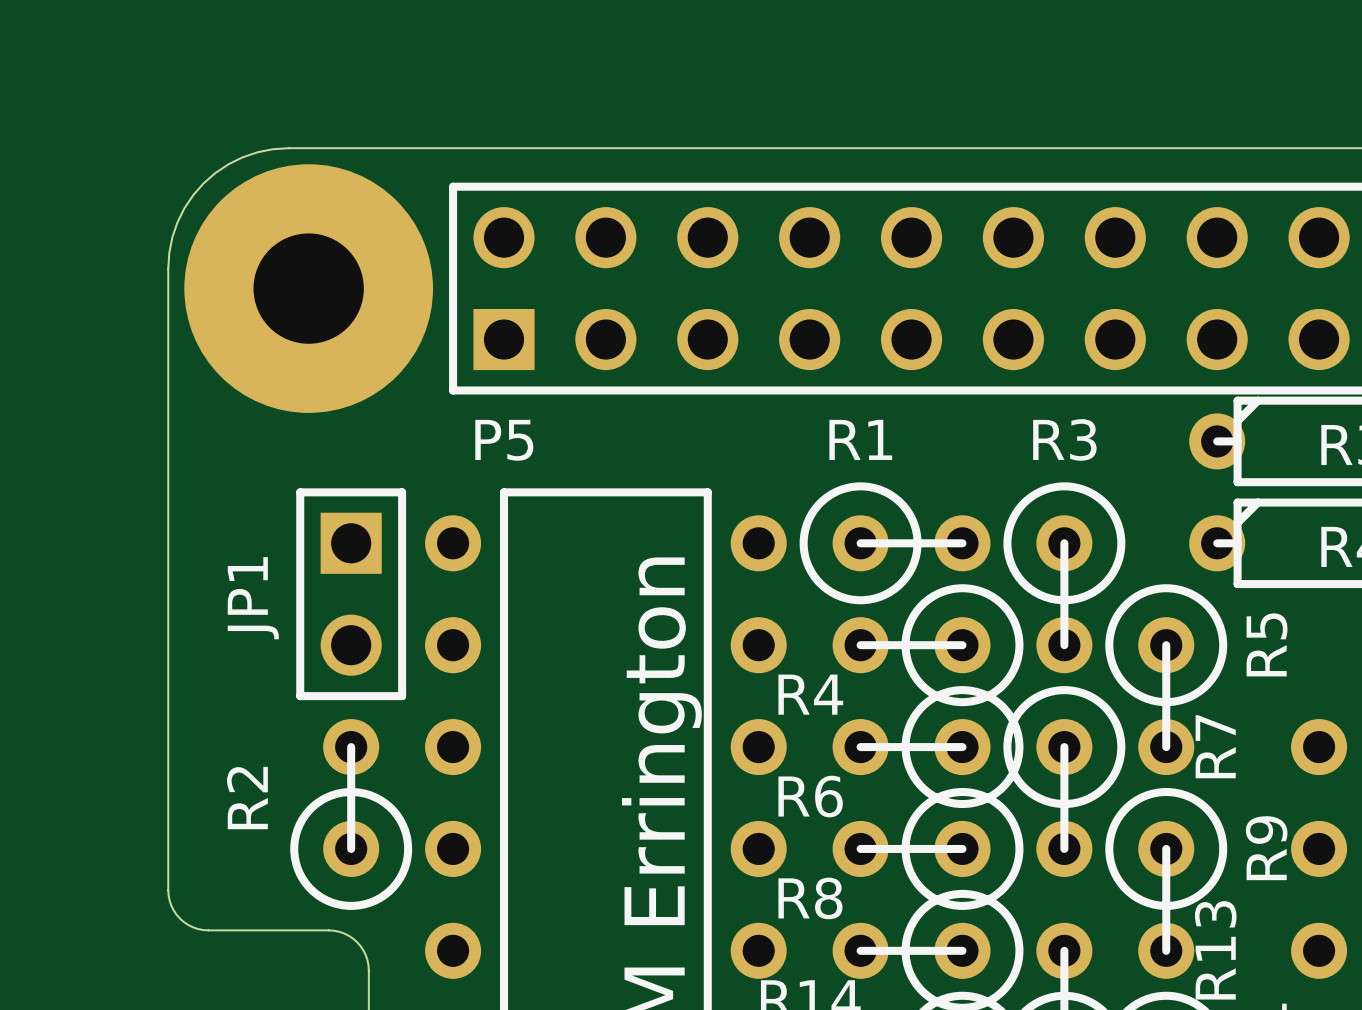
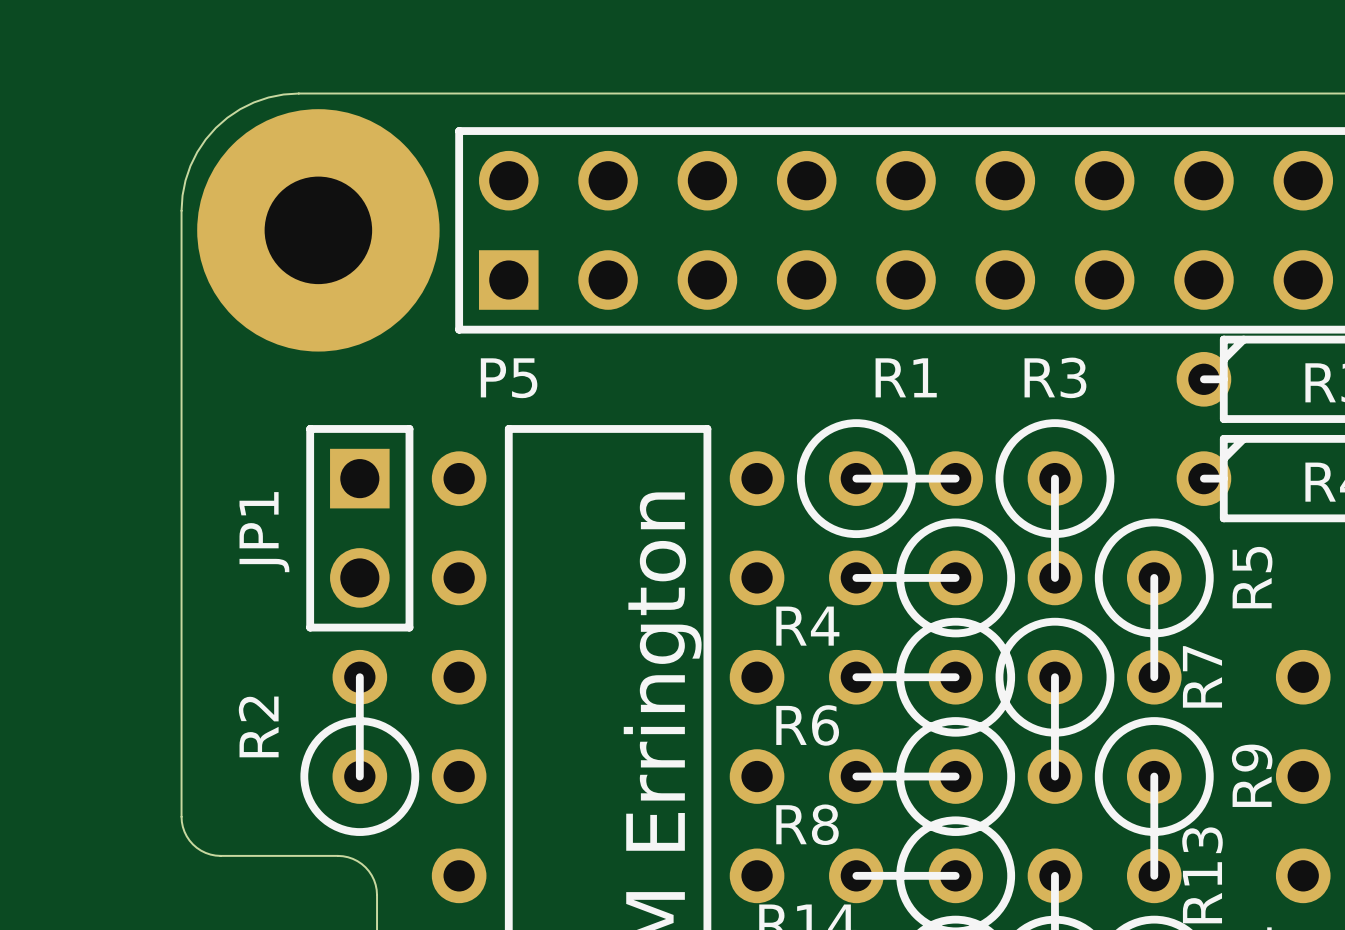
R1 name position: R1 (860, 439) -> R1 (906, 377)

